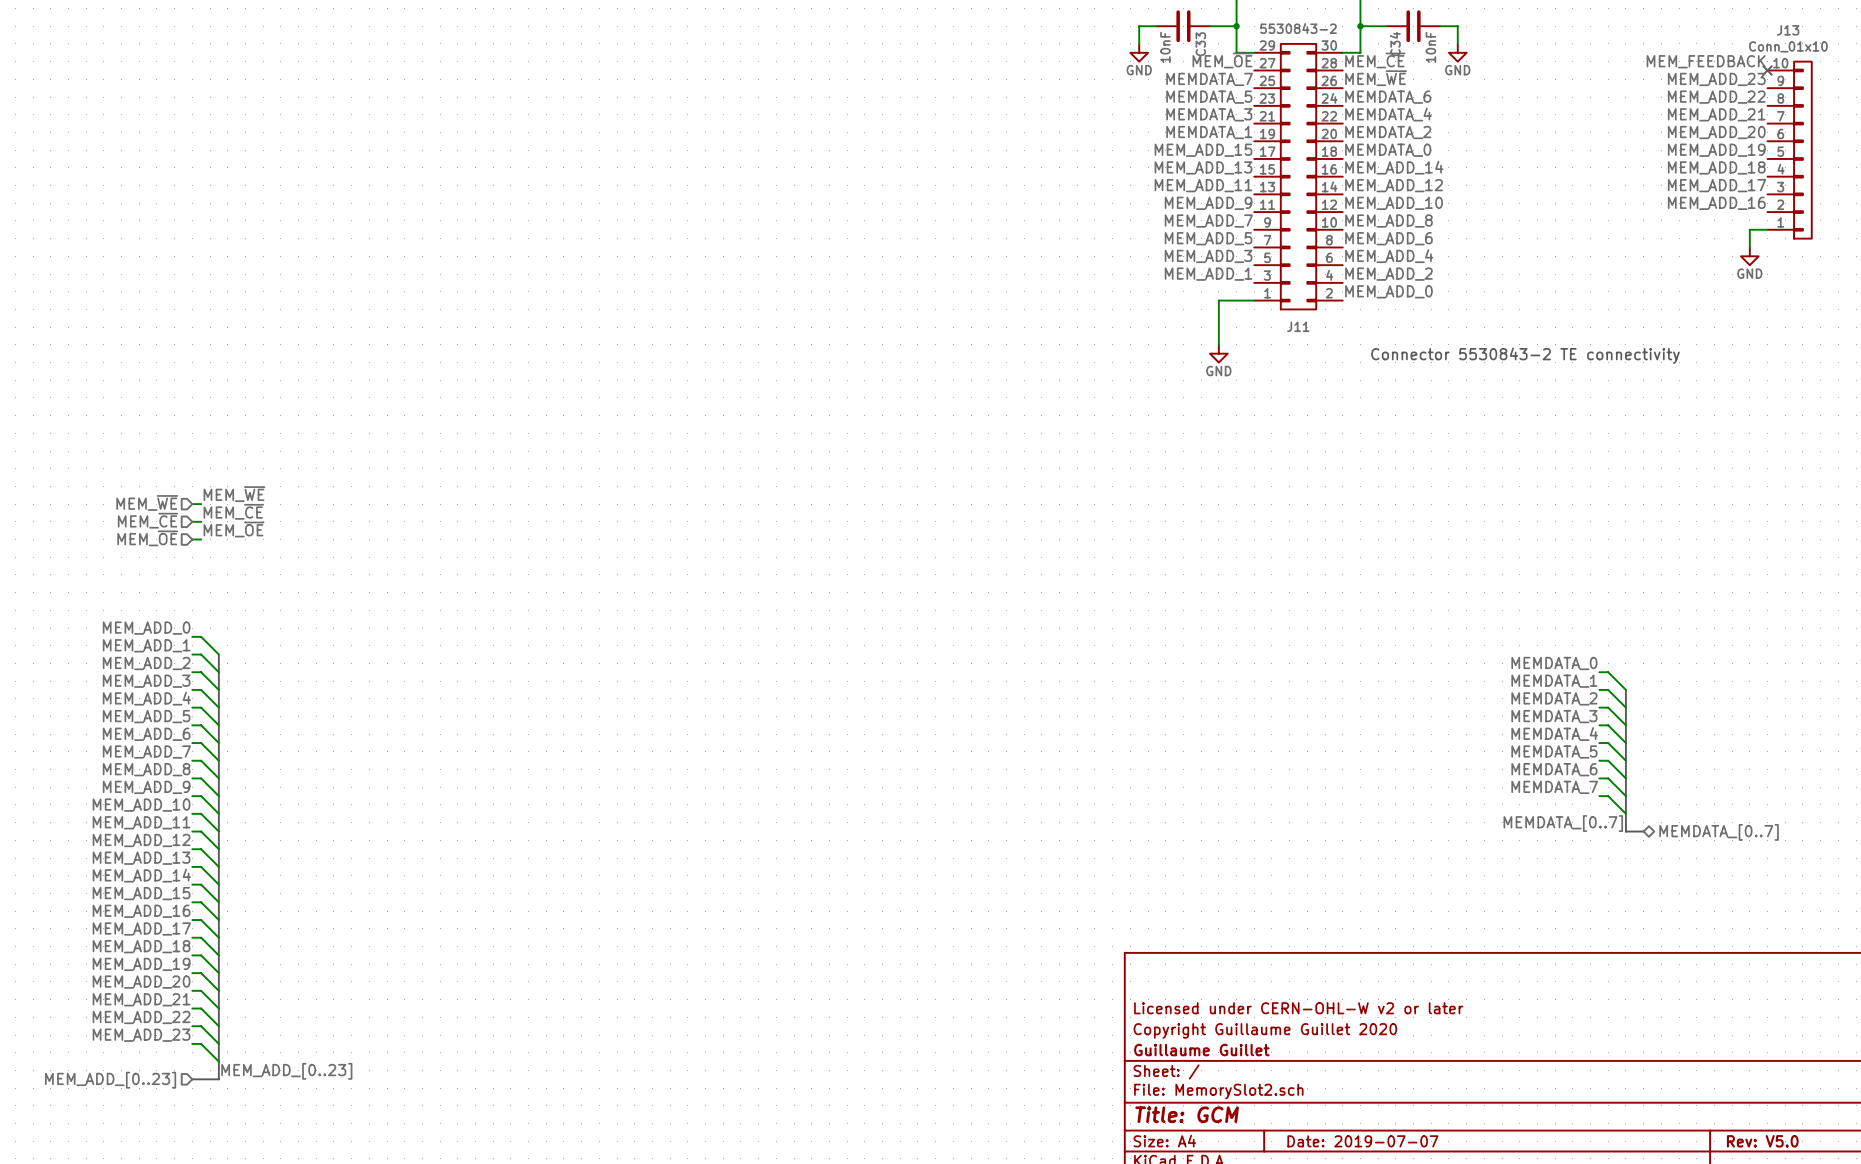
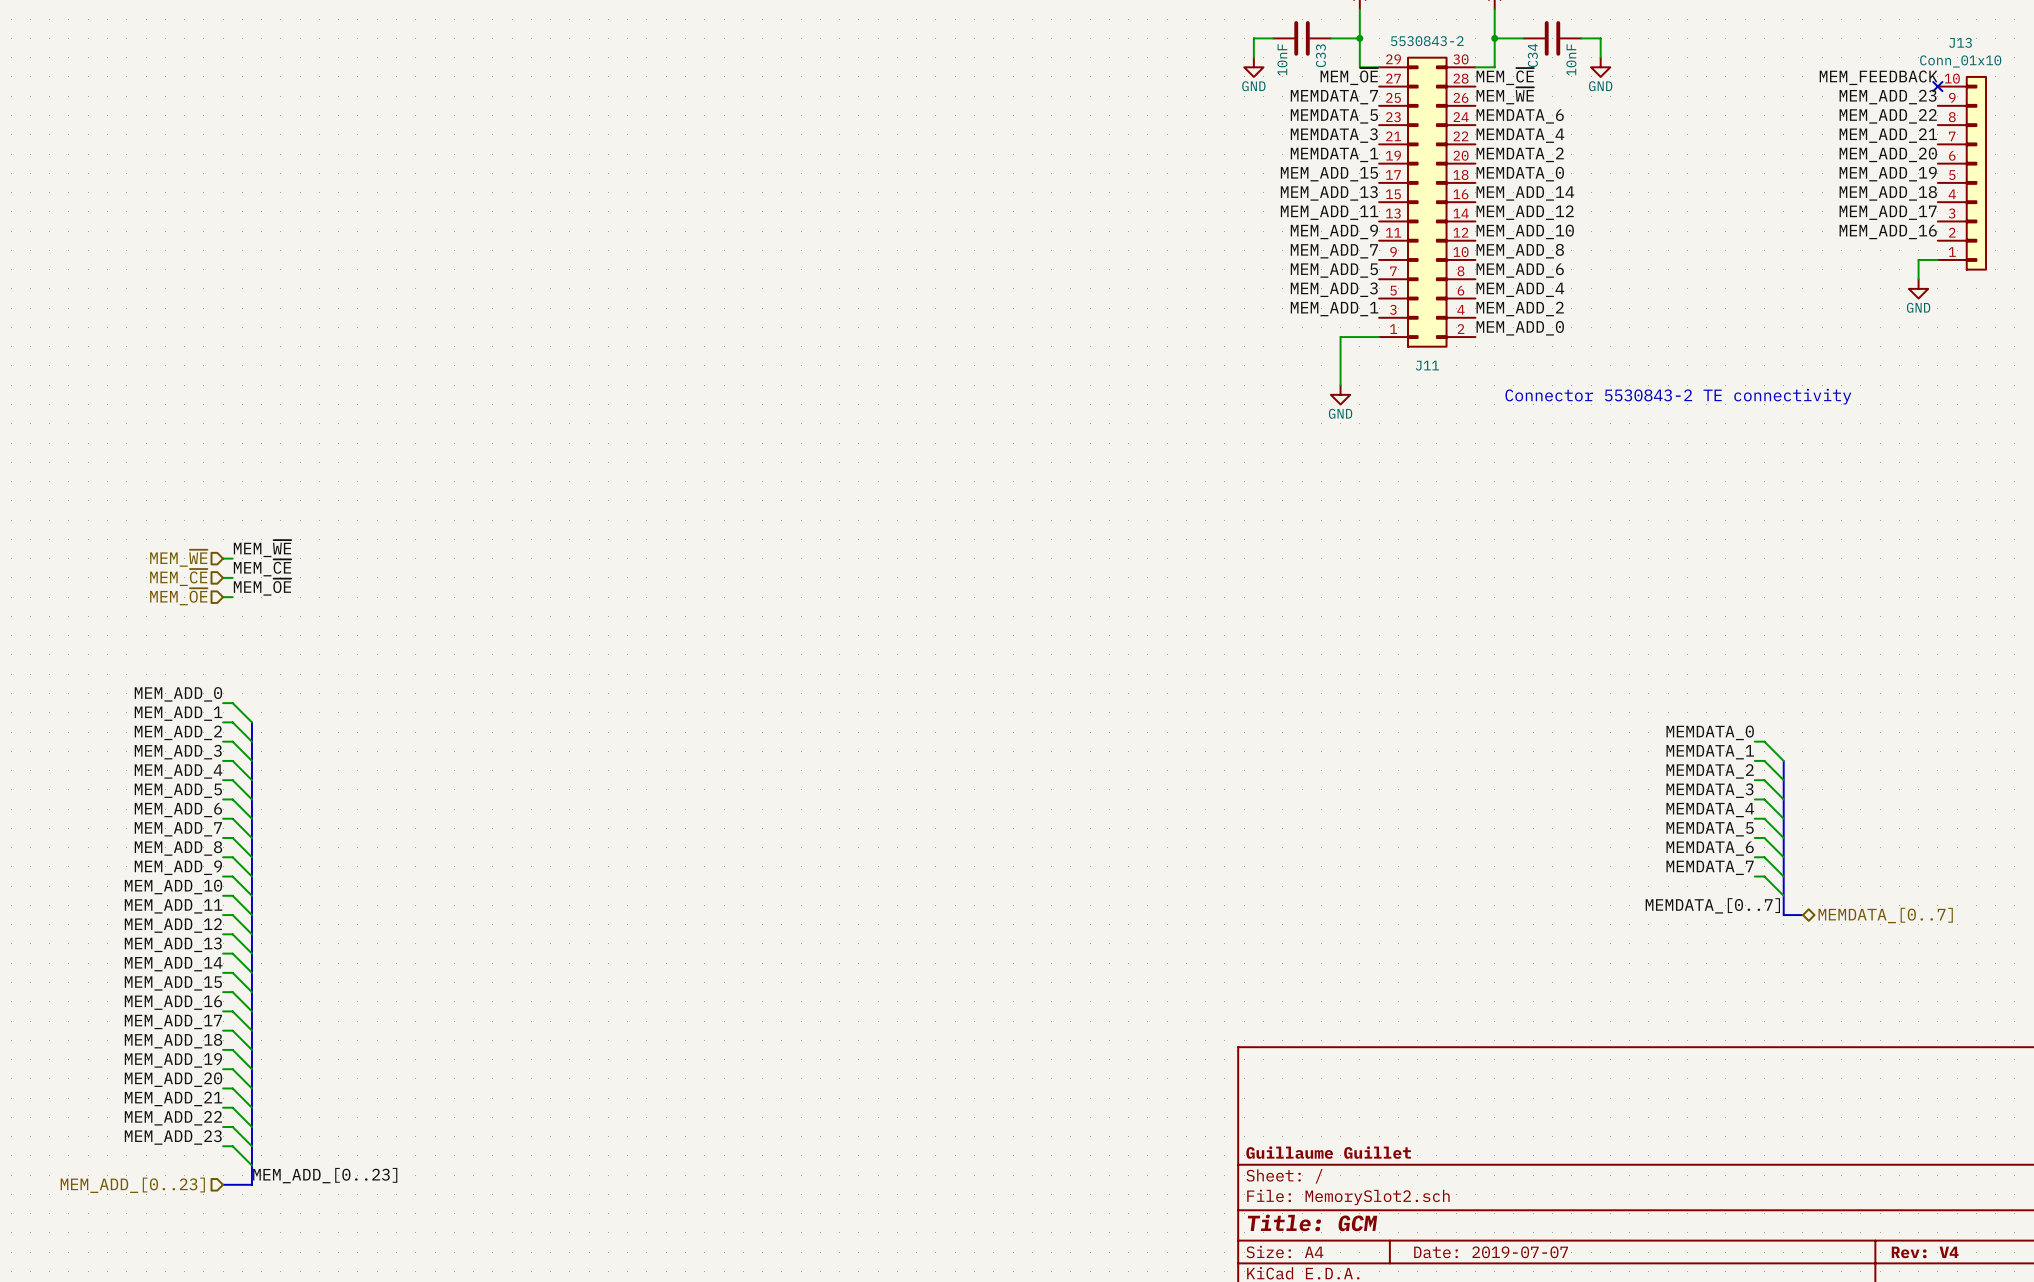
title block: Licensed under CERN-OHL-W v2 or later (1298, 1008) -> none
title block: Copyright Guillaume Guillet 2020 (1265, 1030) -> none
title block: Rev: V5.0 (1762, 1141) -> Rev: V4 (1925, 1252)

